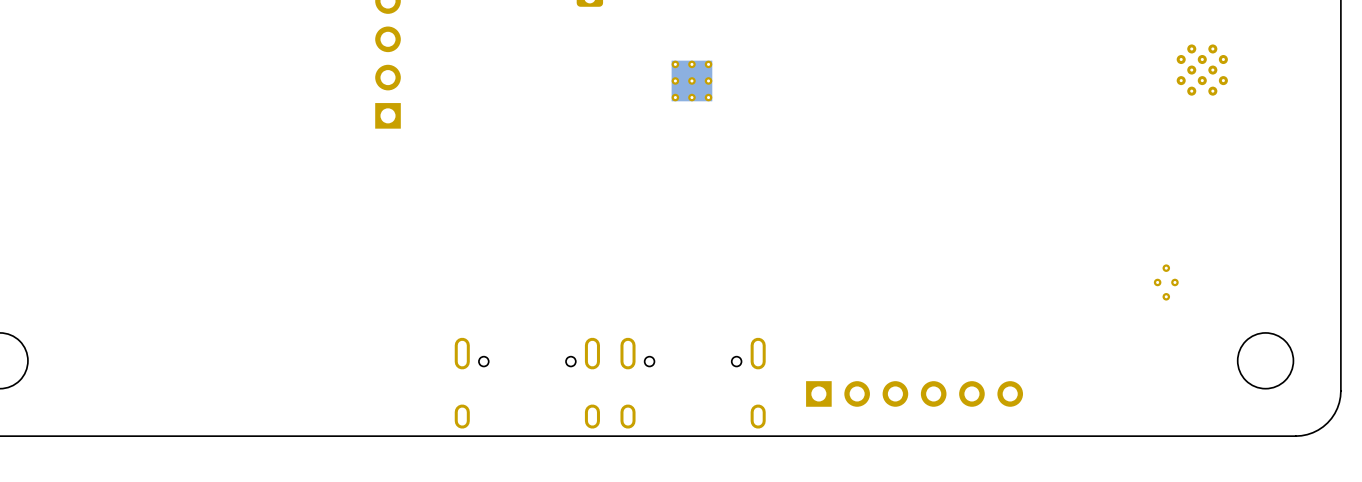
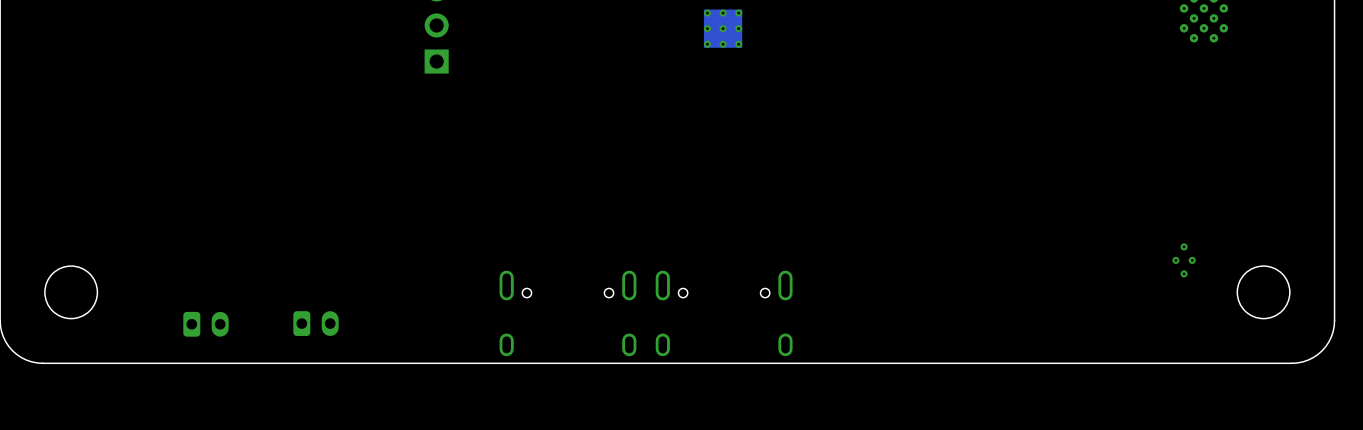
part position: (1166, 282) -> (1184, 260)
part: none -> (316, 323)
part: (914, 393) -> none
part: none -> (205, 324)

